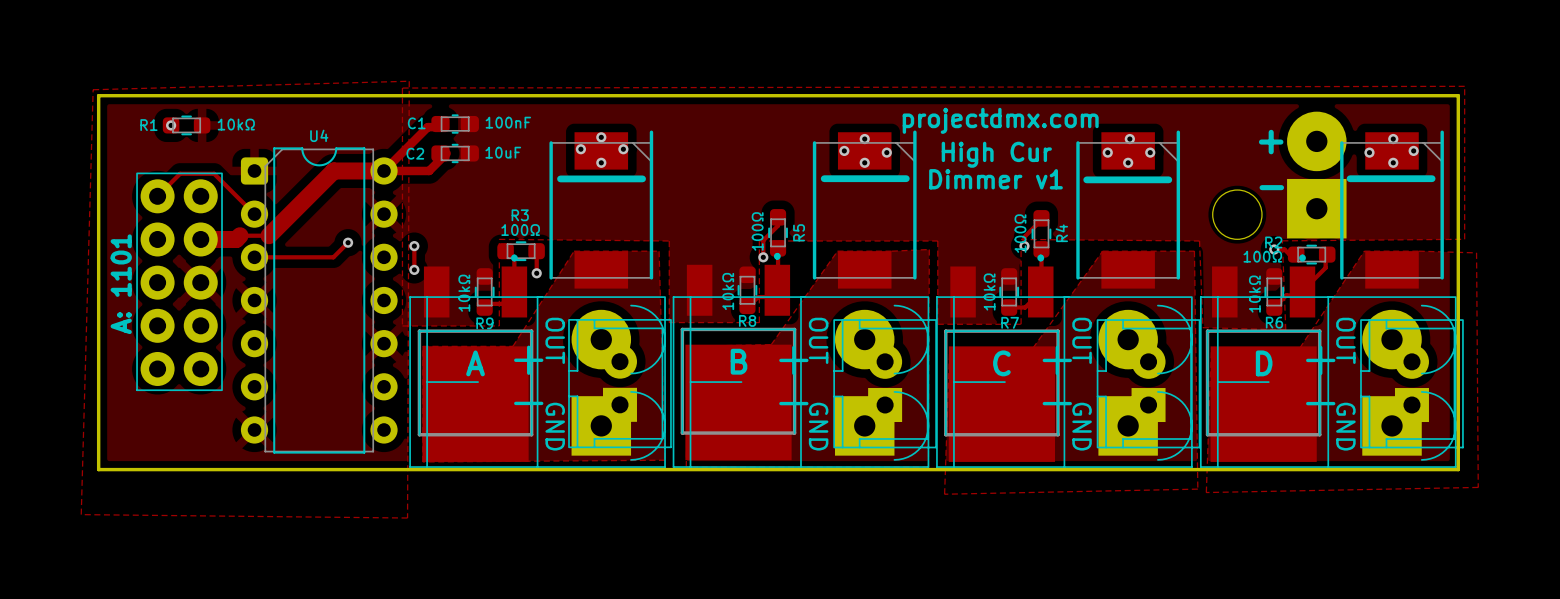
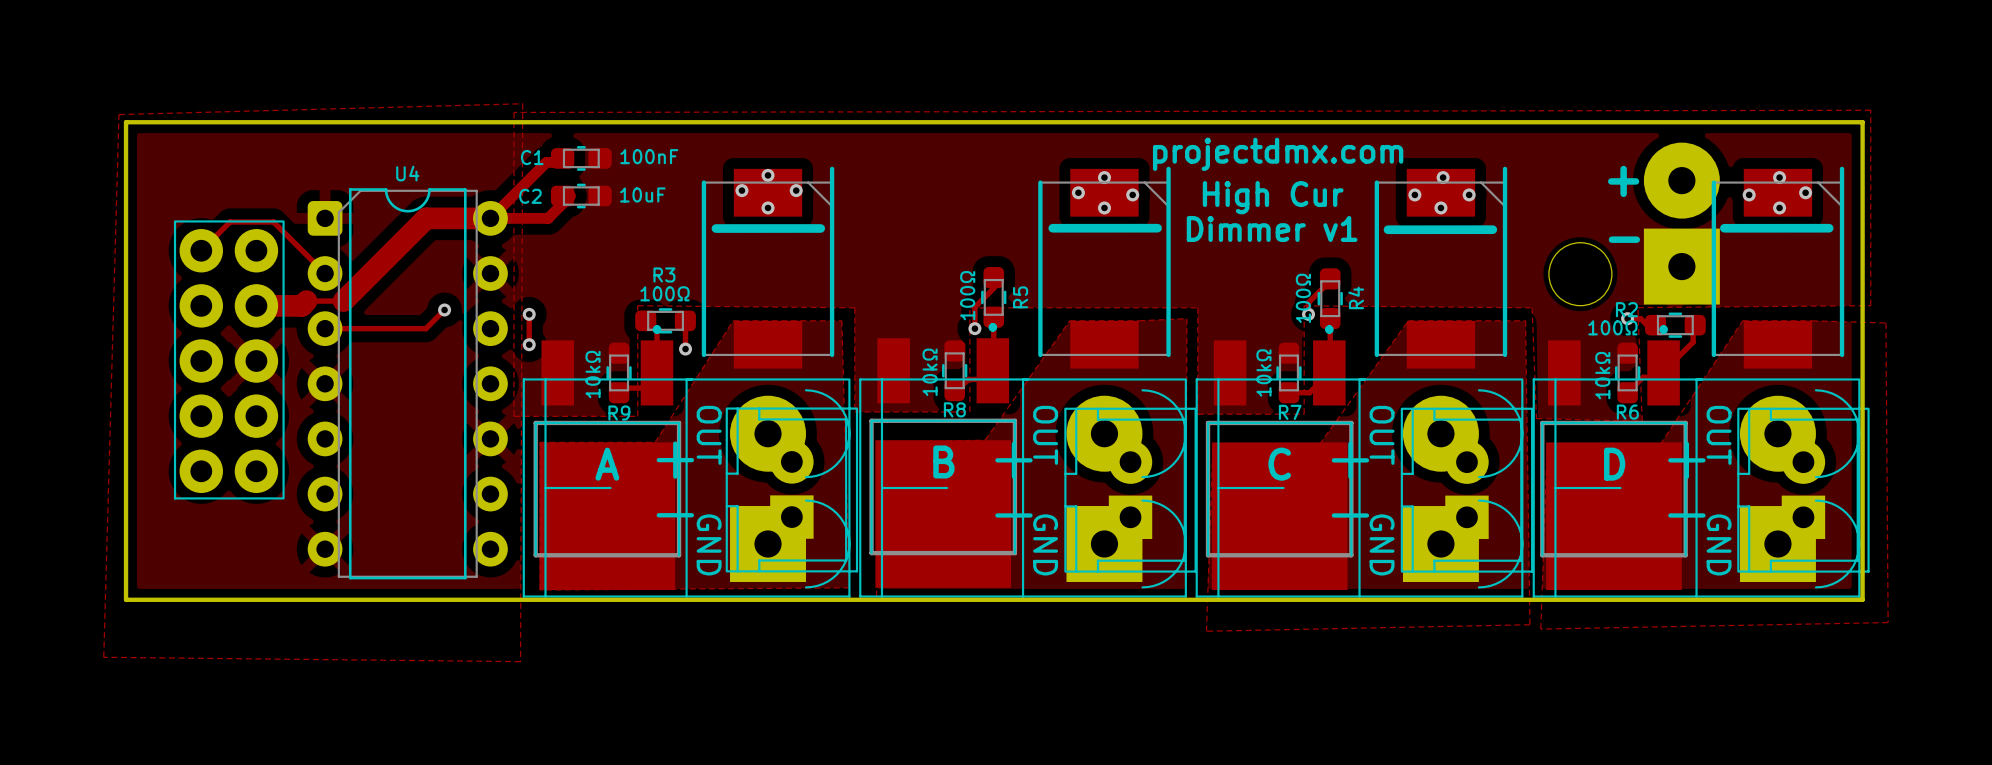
via: (171, 125) -> none
R1: 10kΩ (186, 125) -> none
text: A: 1101 (121, 284) -> none

